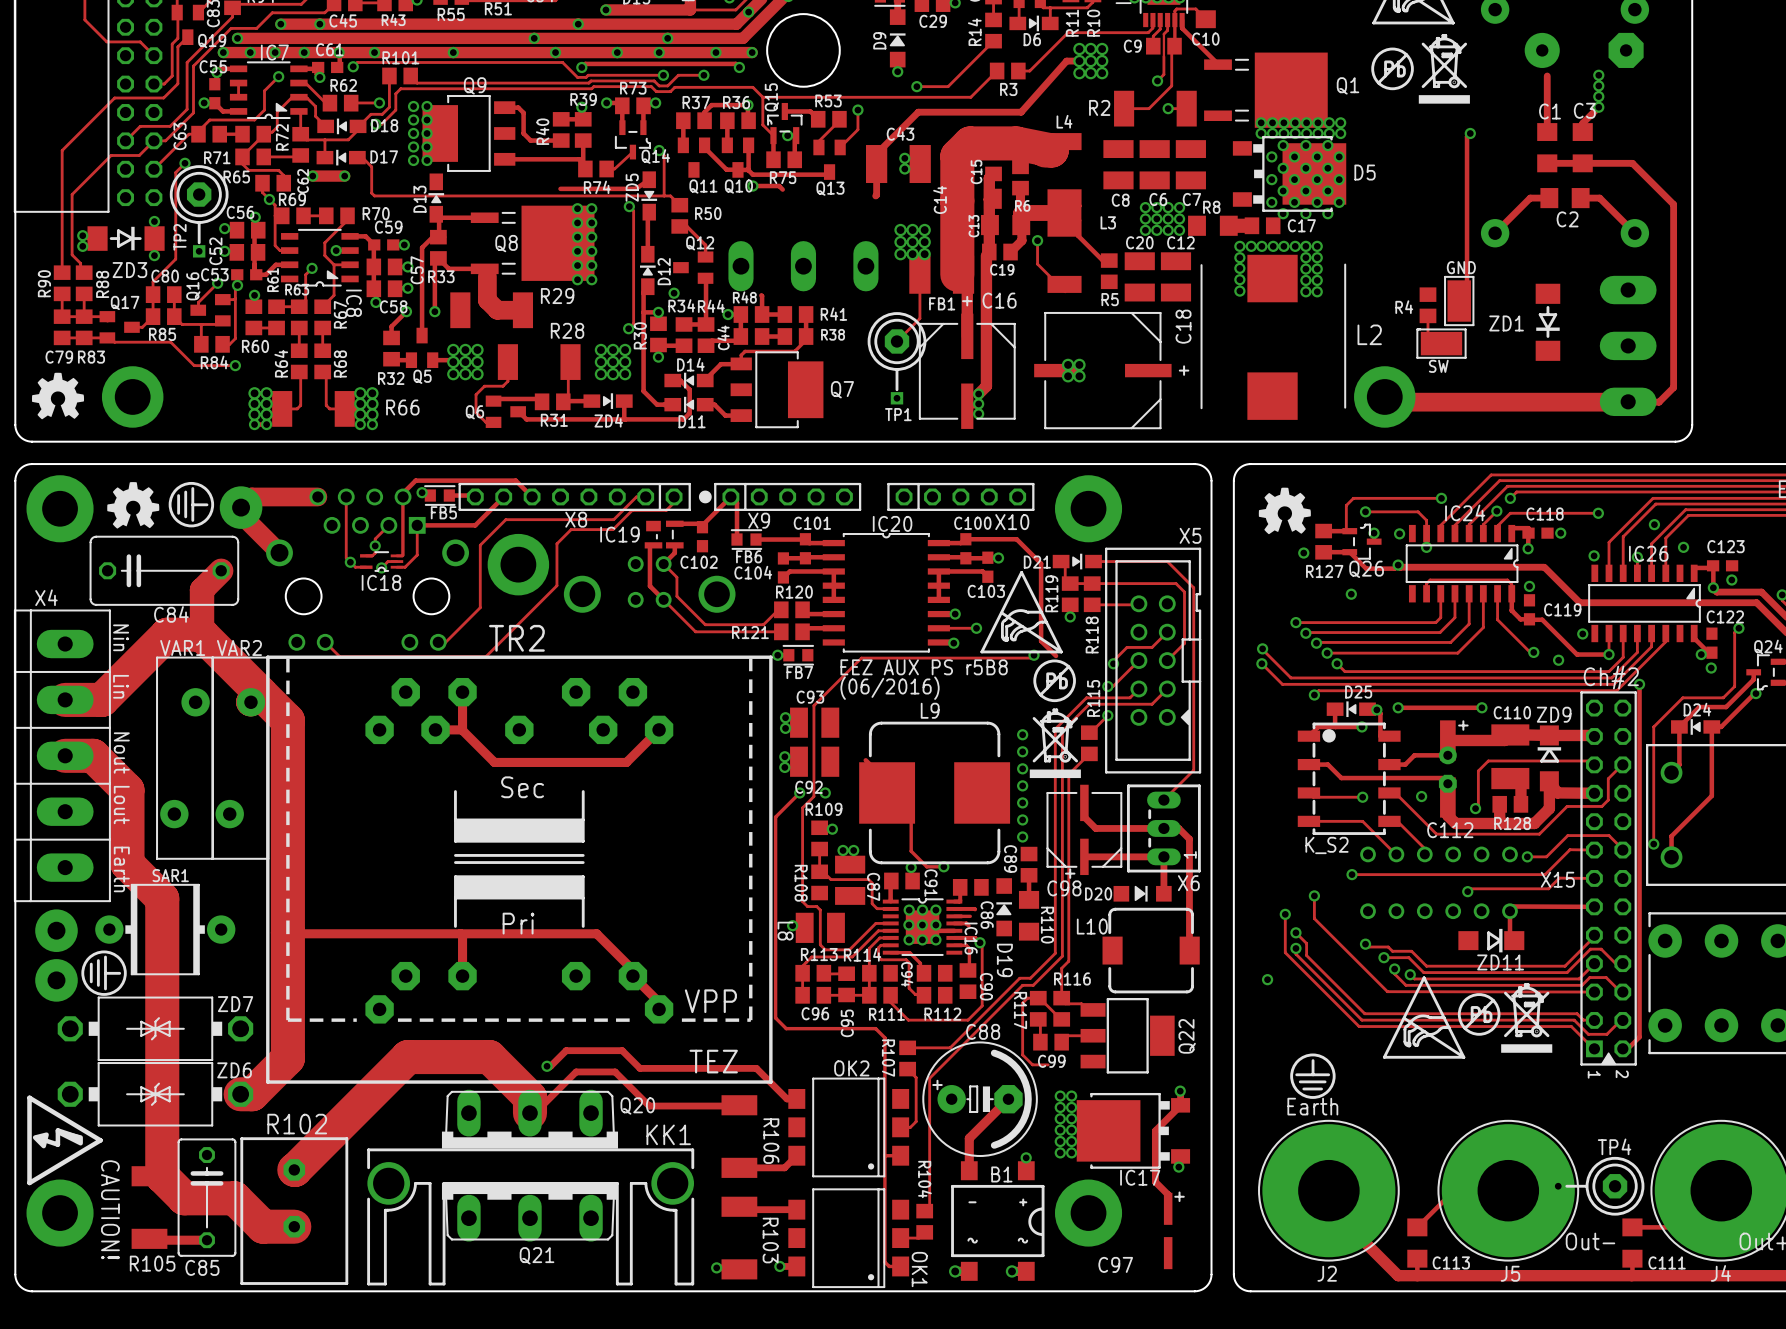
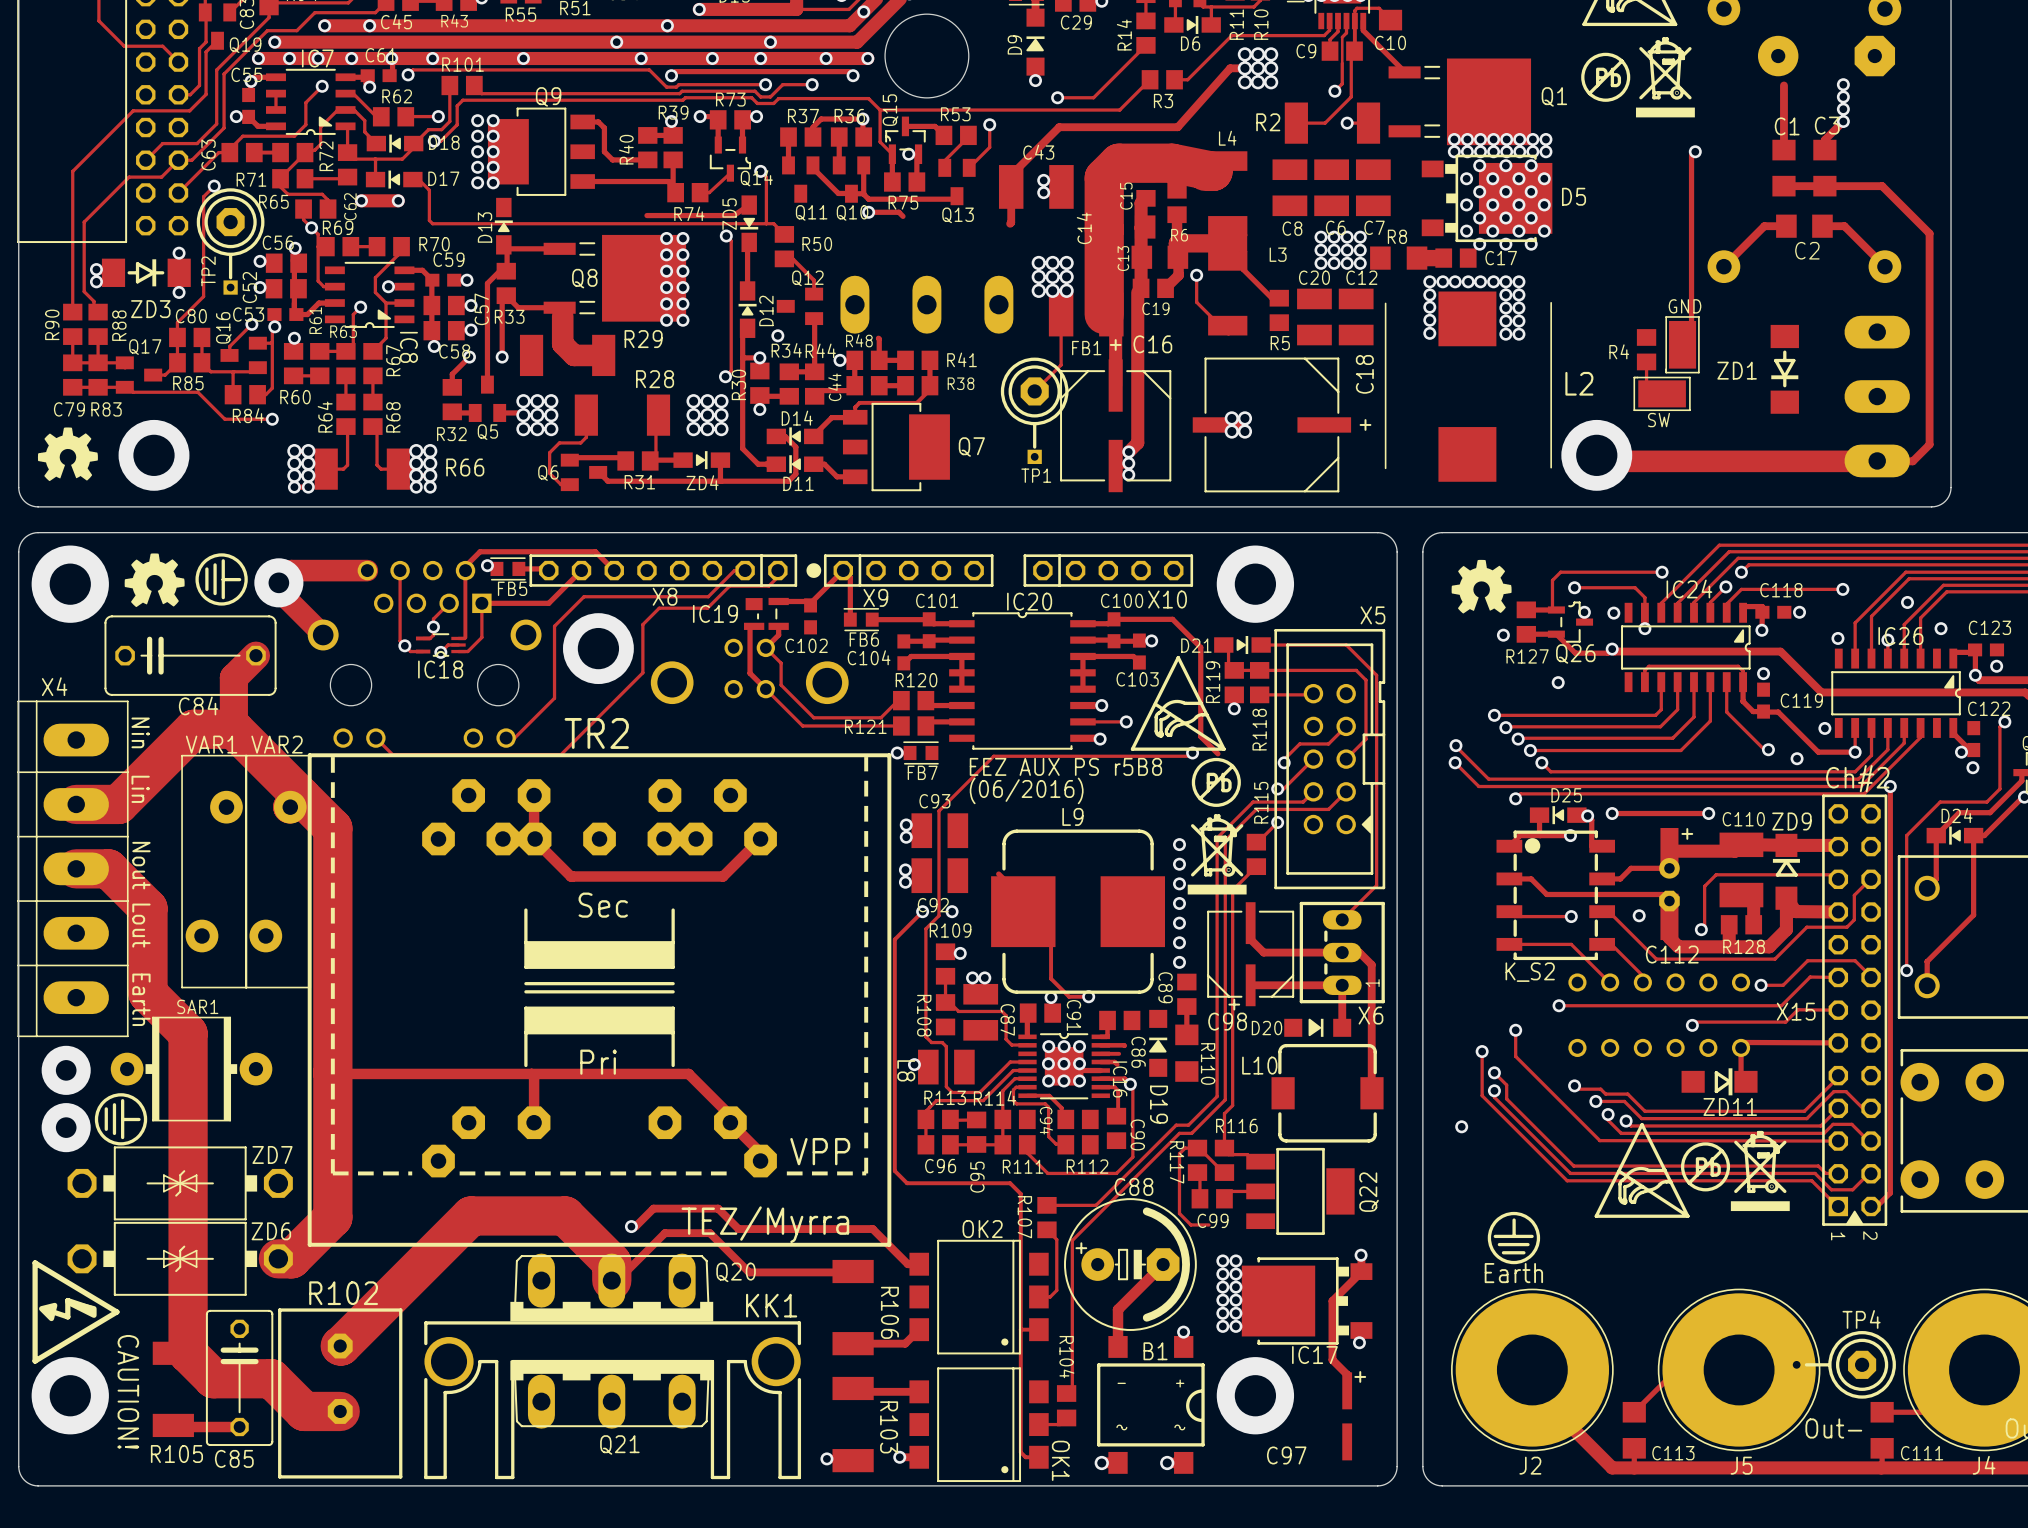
TR2 footprint: [266, 655, 773, 1084] -> [307, 753, 892, 1247]

